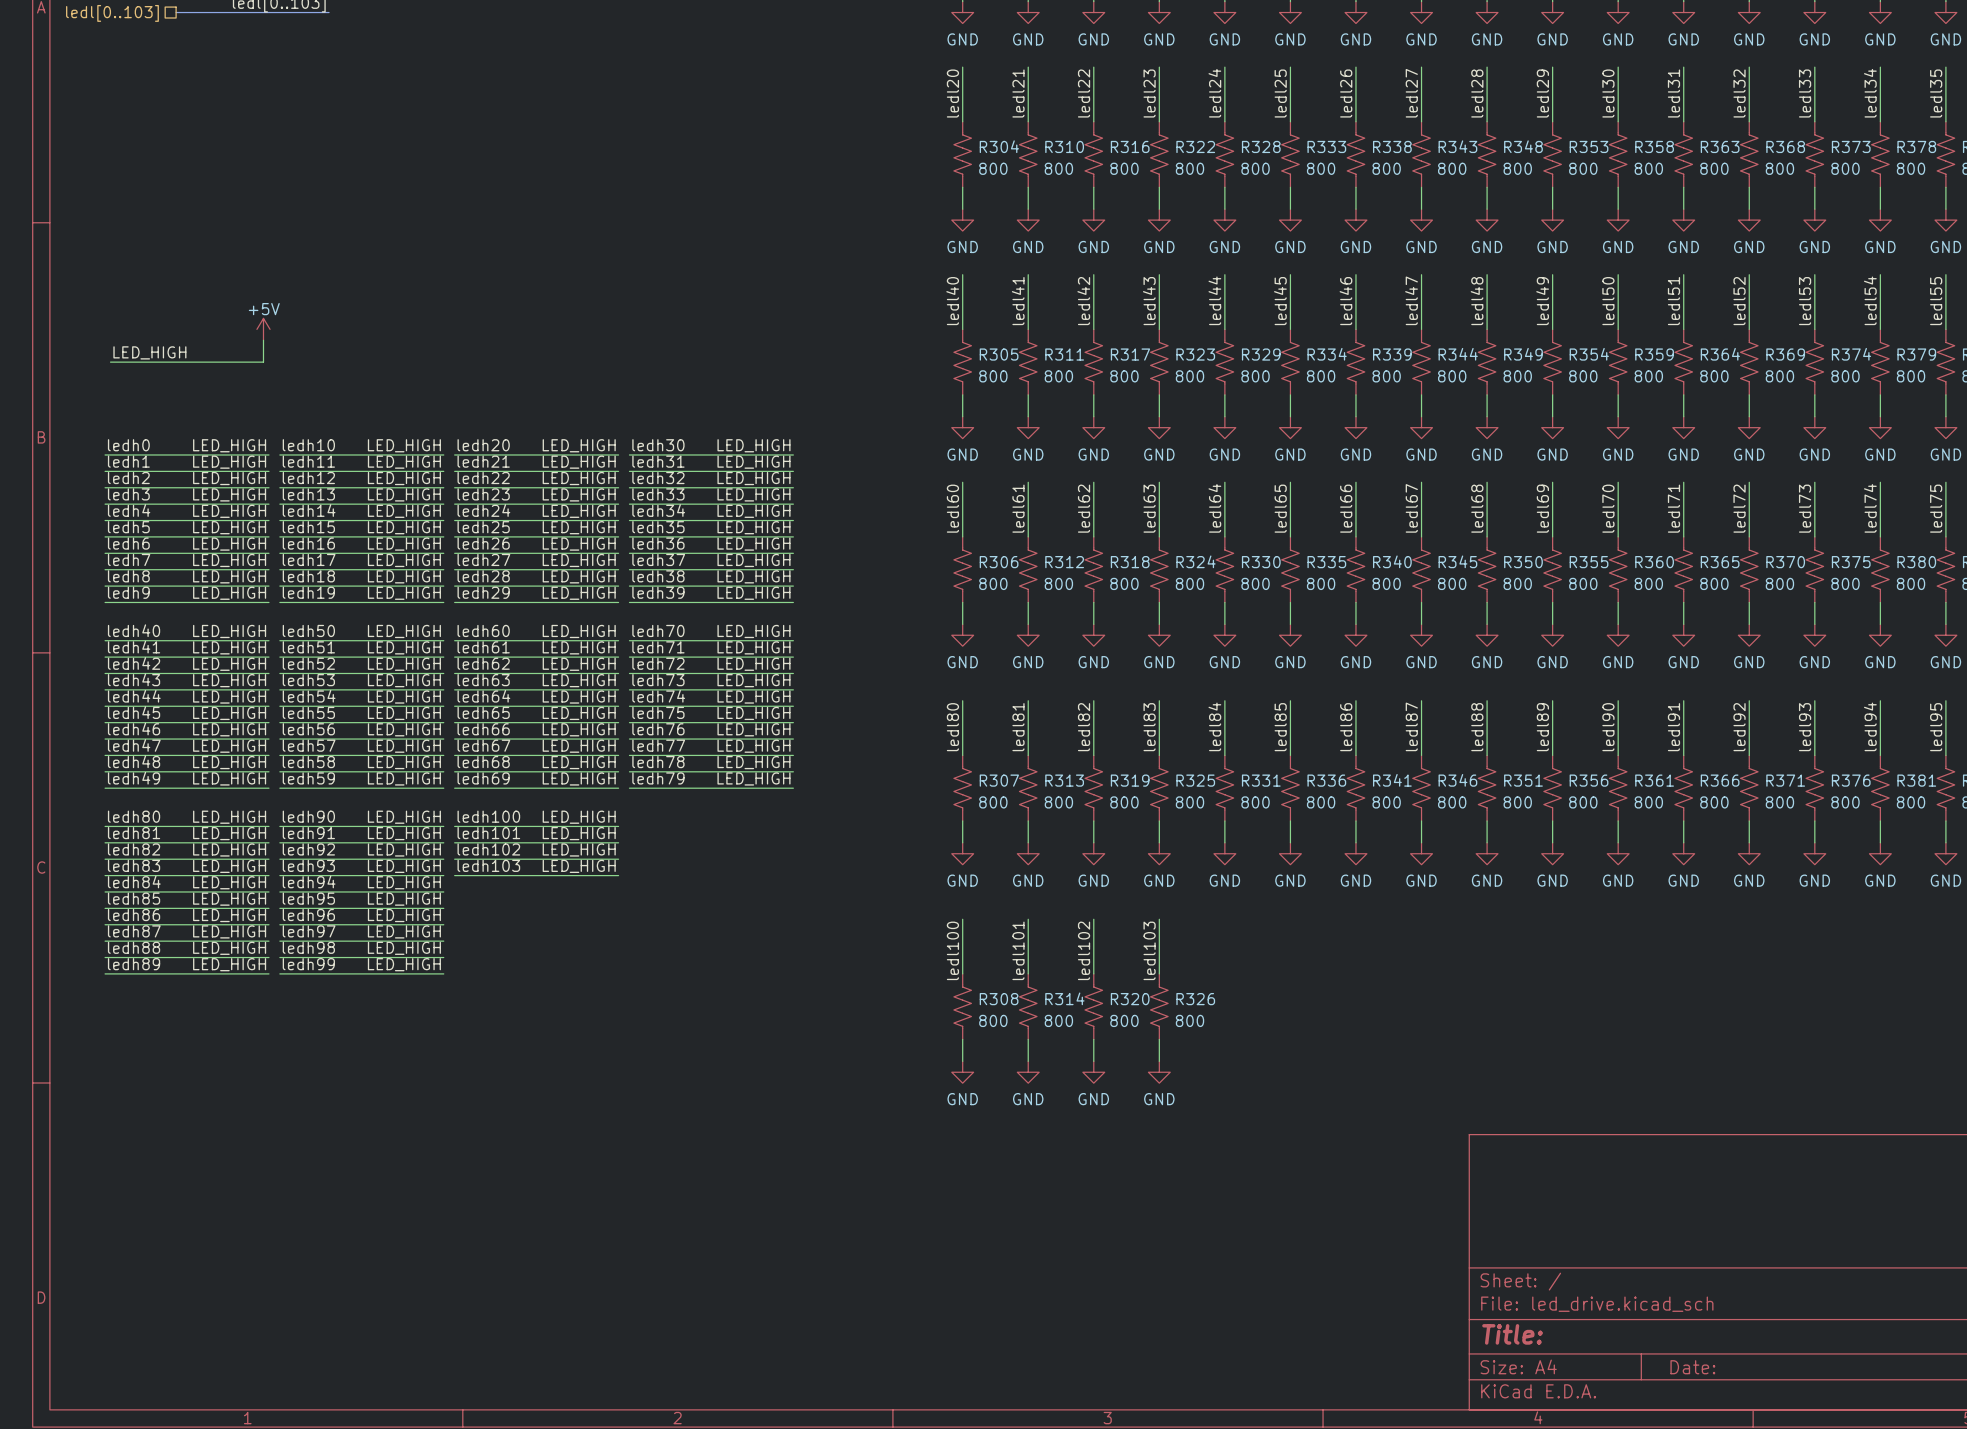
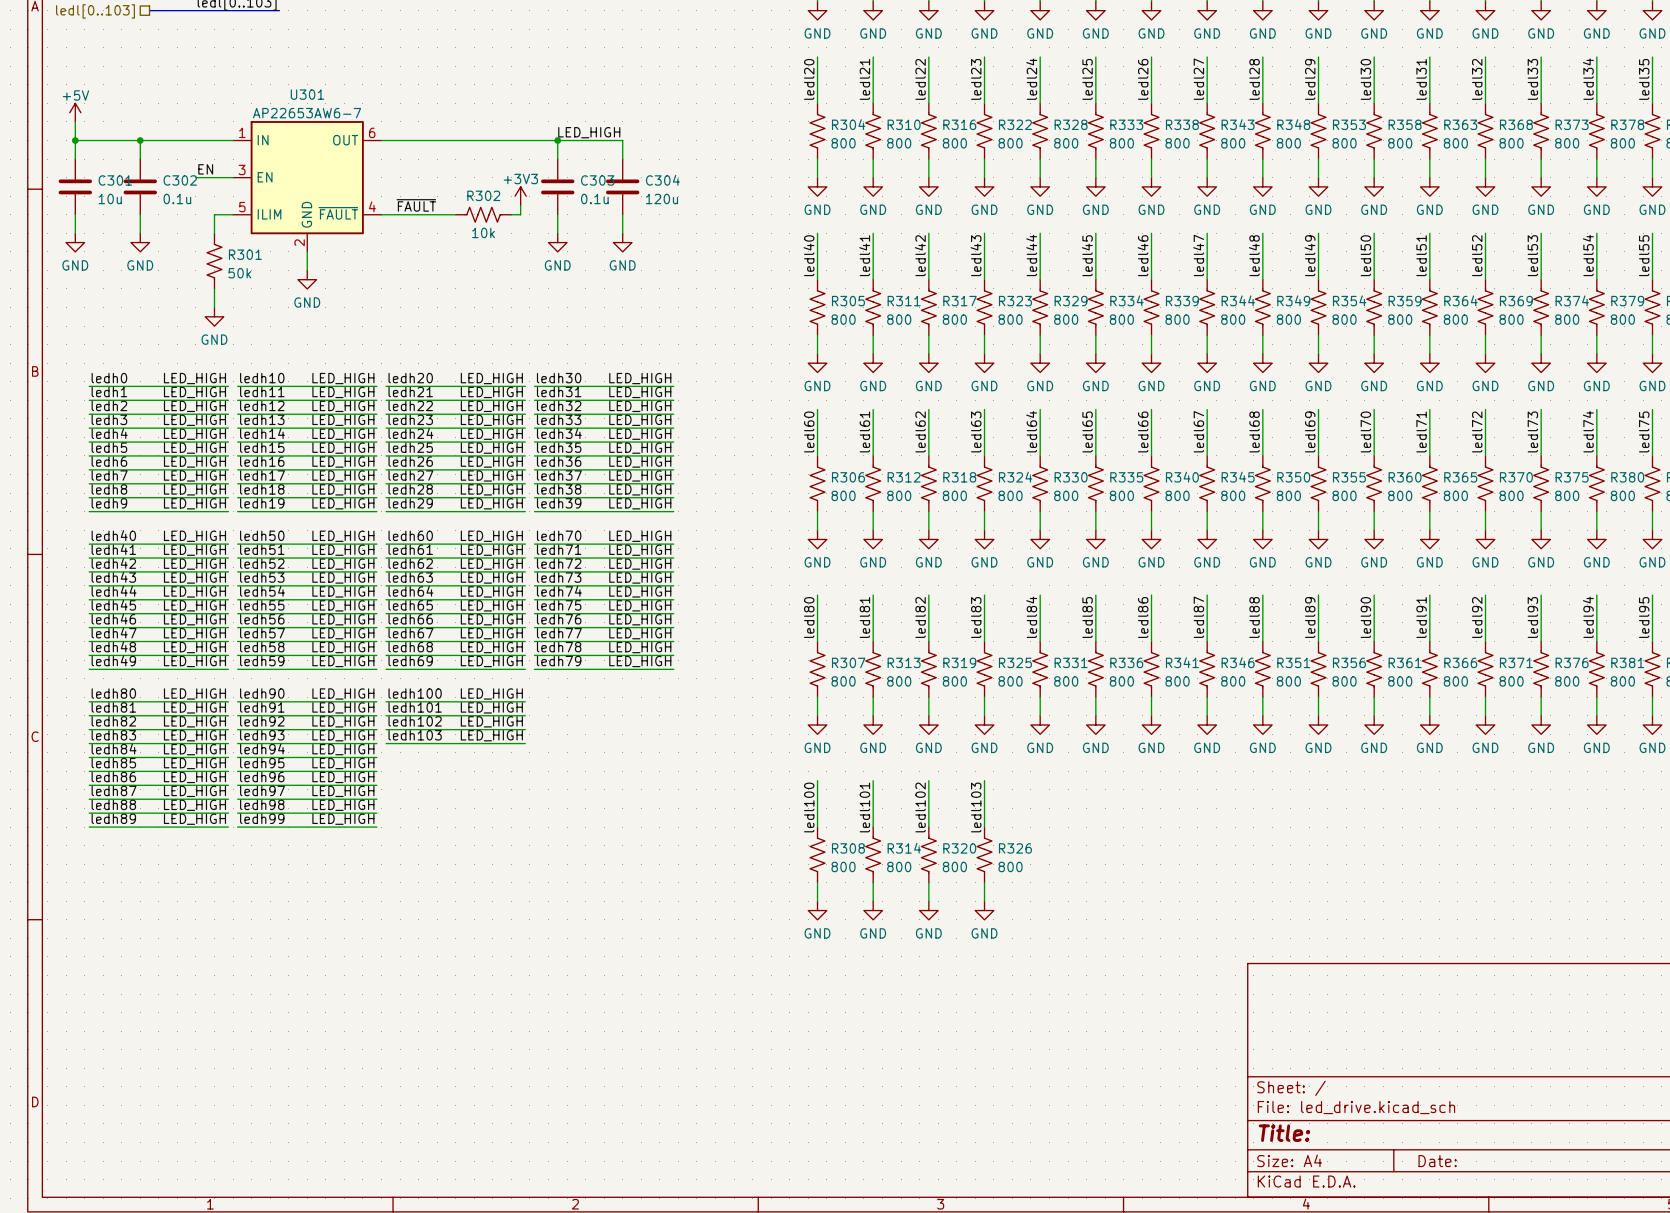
power symbol: none -> +5V (75, 112)
wire: none -> (75, 121) (75, 159)
label: none -> LED_HIGH (589, 132)
wire: none -> (75, 140) (233, 140)
junction: none -> (75, 140)
wire: none -> (140, 140) (140, 159)
junction: none -> (140, 140)
wire: none -> (381, 140) (622, 140) (622, 159)
wire: none -> (557, 140) (557, 159)
junction: none -> (557, 140)
label: none -> EN (205, 169)
wire: none -> (195, 177) (233, 177)
U301: none -> AP22653AW6-7 (307, 186)
C301: none -> 10u (75, 186)
C302: none -> 0.1u (140, 186)
C303: none -> 0.1u (557, 186)
C304: none -> 120u (622, 186)
power symbol: none -> +3V3 (520, 196)
label: none -> ~{FAULT} (416, 205)
wire: none -> (520, 205) (520, 214) (511, 214)
wire: none -> (75, 214) (75, 233)
wire: none -> (140, 214) (140, 233)
wire: none -> (233, 214) (214, 214) (214, 233)
wire: none -> (381, 214) (455, 214)
R302: none -> 10k (483, 214)
wire: none -> (557, 214) (557, 233)
wire: none -> (622, 214) (622, 233)
power symbol: none -> GND (75, 242)
power symbol: none -> GND (140, 242)
power symbol: none -> GND (557, 242)
power symbol: none -> GND (622, 242)
wire: none -> (307, 251) (307, 270)
R301: none -> 50k (214, 261)
power symbol: +5V (263, 329) -> none
power symbol: none -> GND (307, 279)
wire: none -> (214, 288) (214, 307)
wire: (263, 340) (263, 362) (110, 362) -> none
label: LED_HIGH (149, 352) -> none
power symbol: none -> GND (214, 316)

